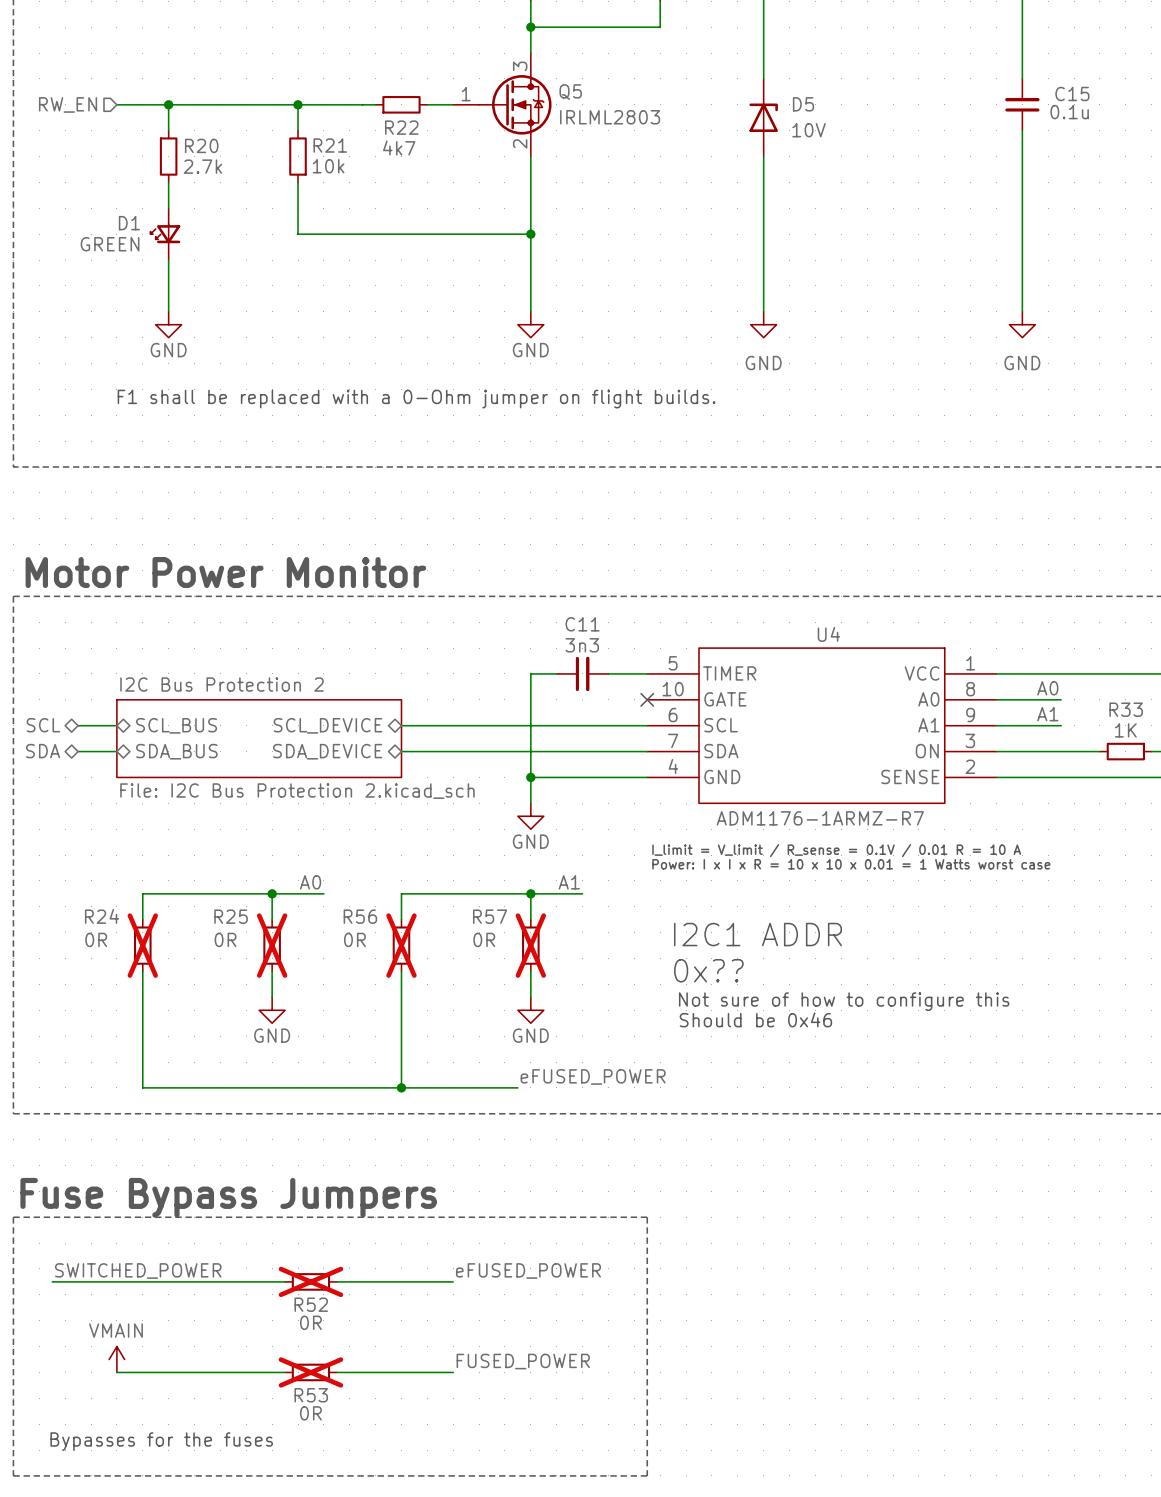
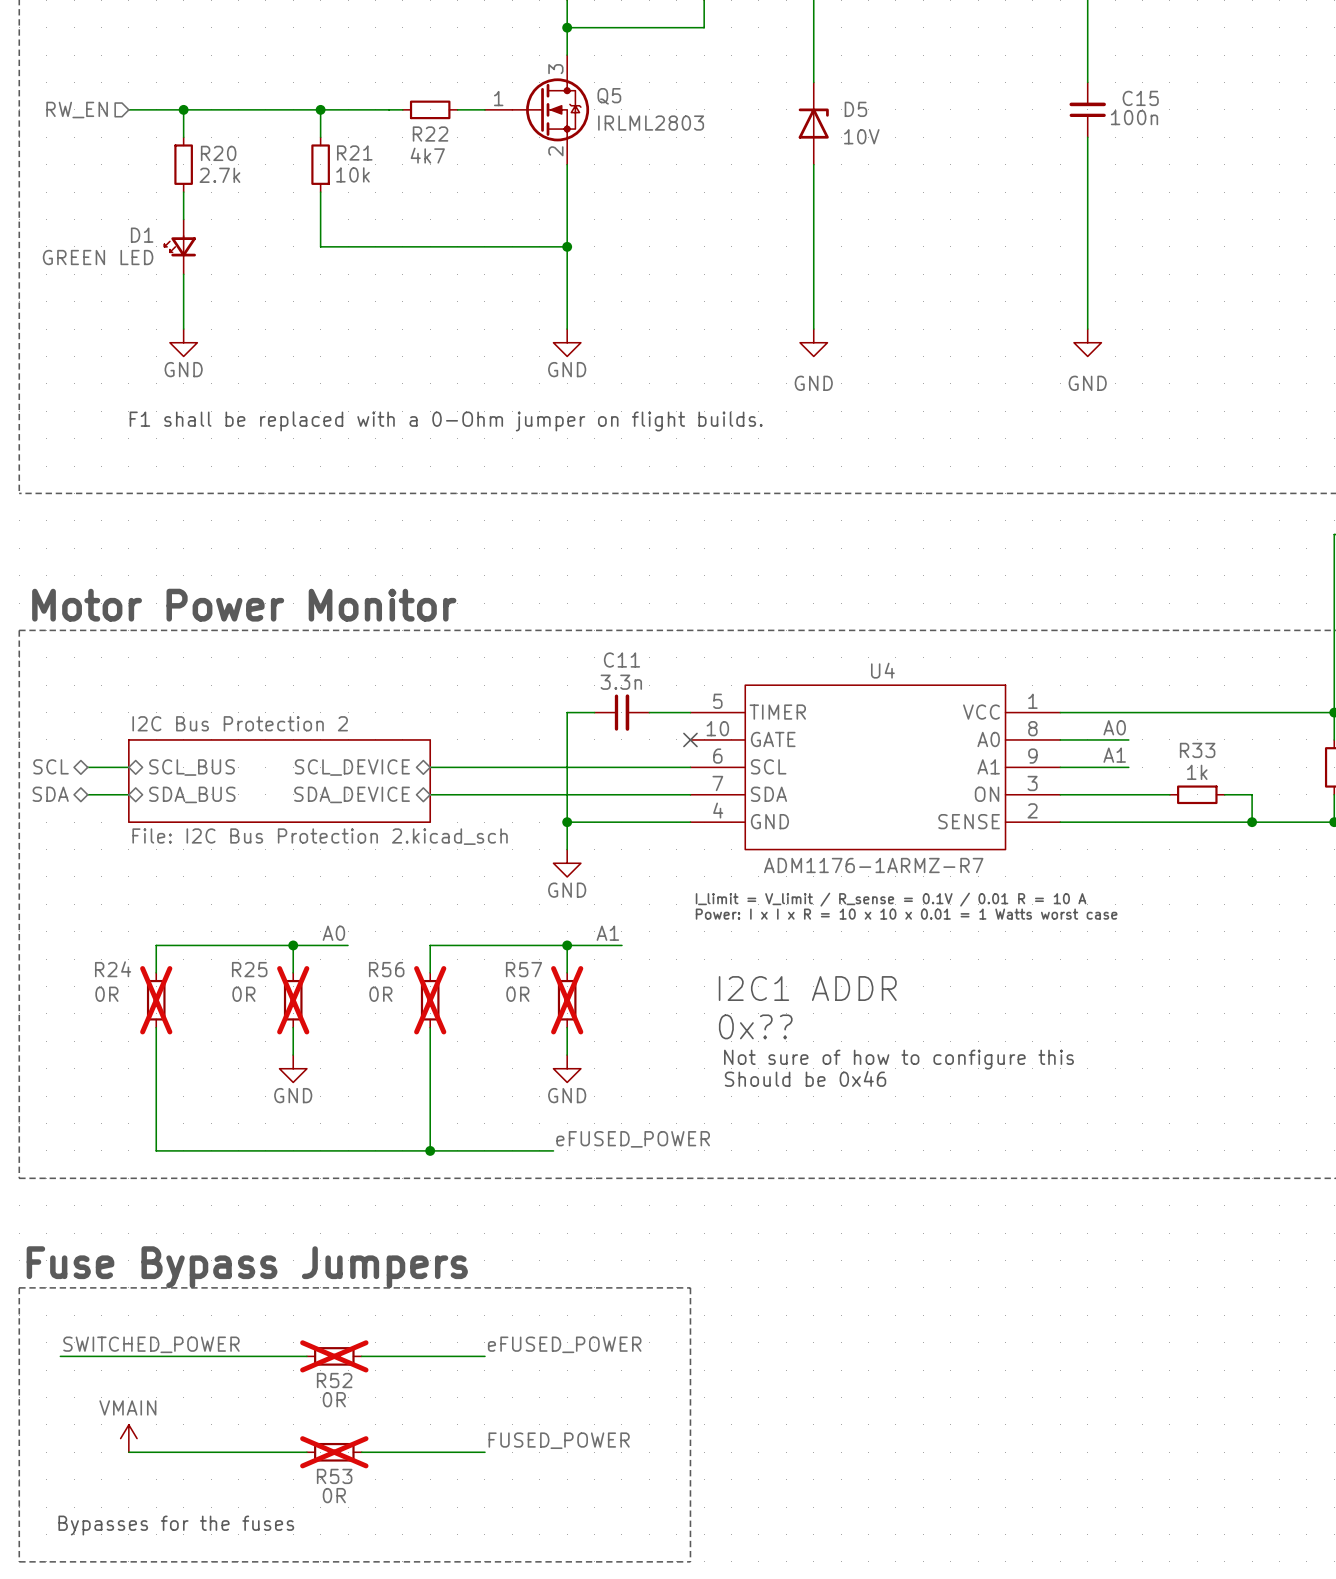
C15 value: 0.1u (1069, 112) -> 100n (1134, 117)
D1 value: GREEN (110, 244) -> GREEN LED (98, 257)
C11 value: 3n3 (582, 645) -> 3.3n (621, 682)
R33 value: 1K (1125, 730) -> 1k (1197, 772)

